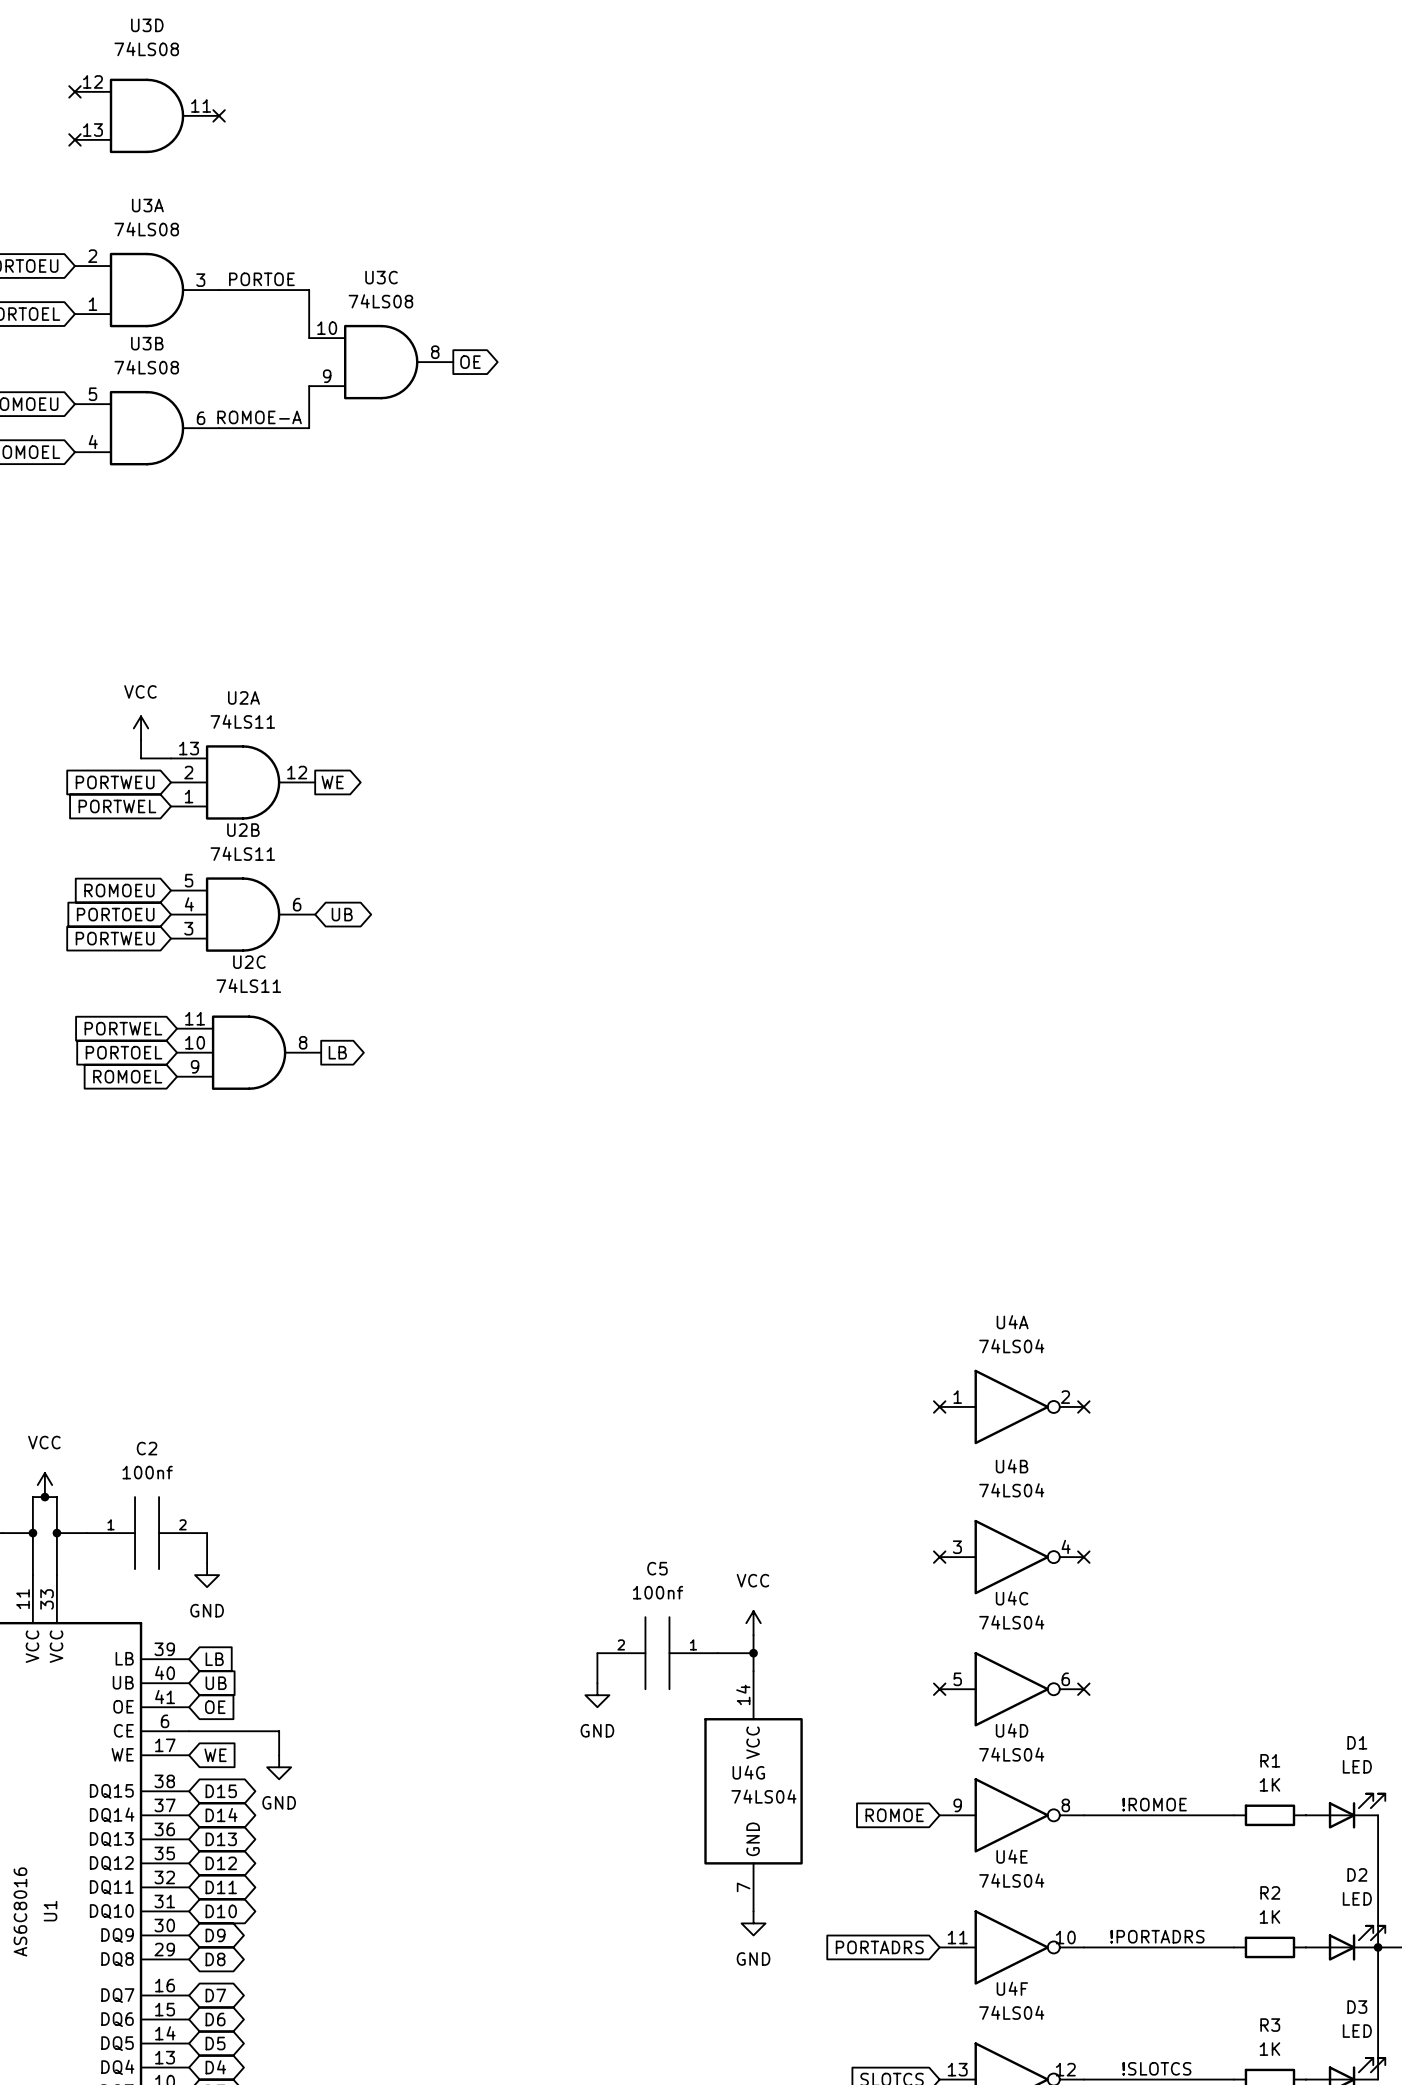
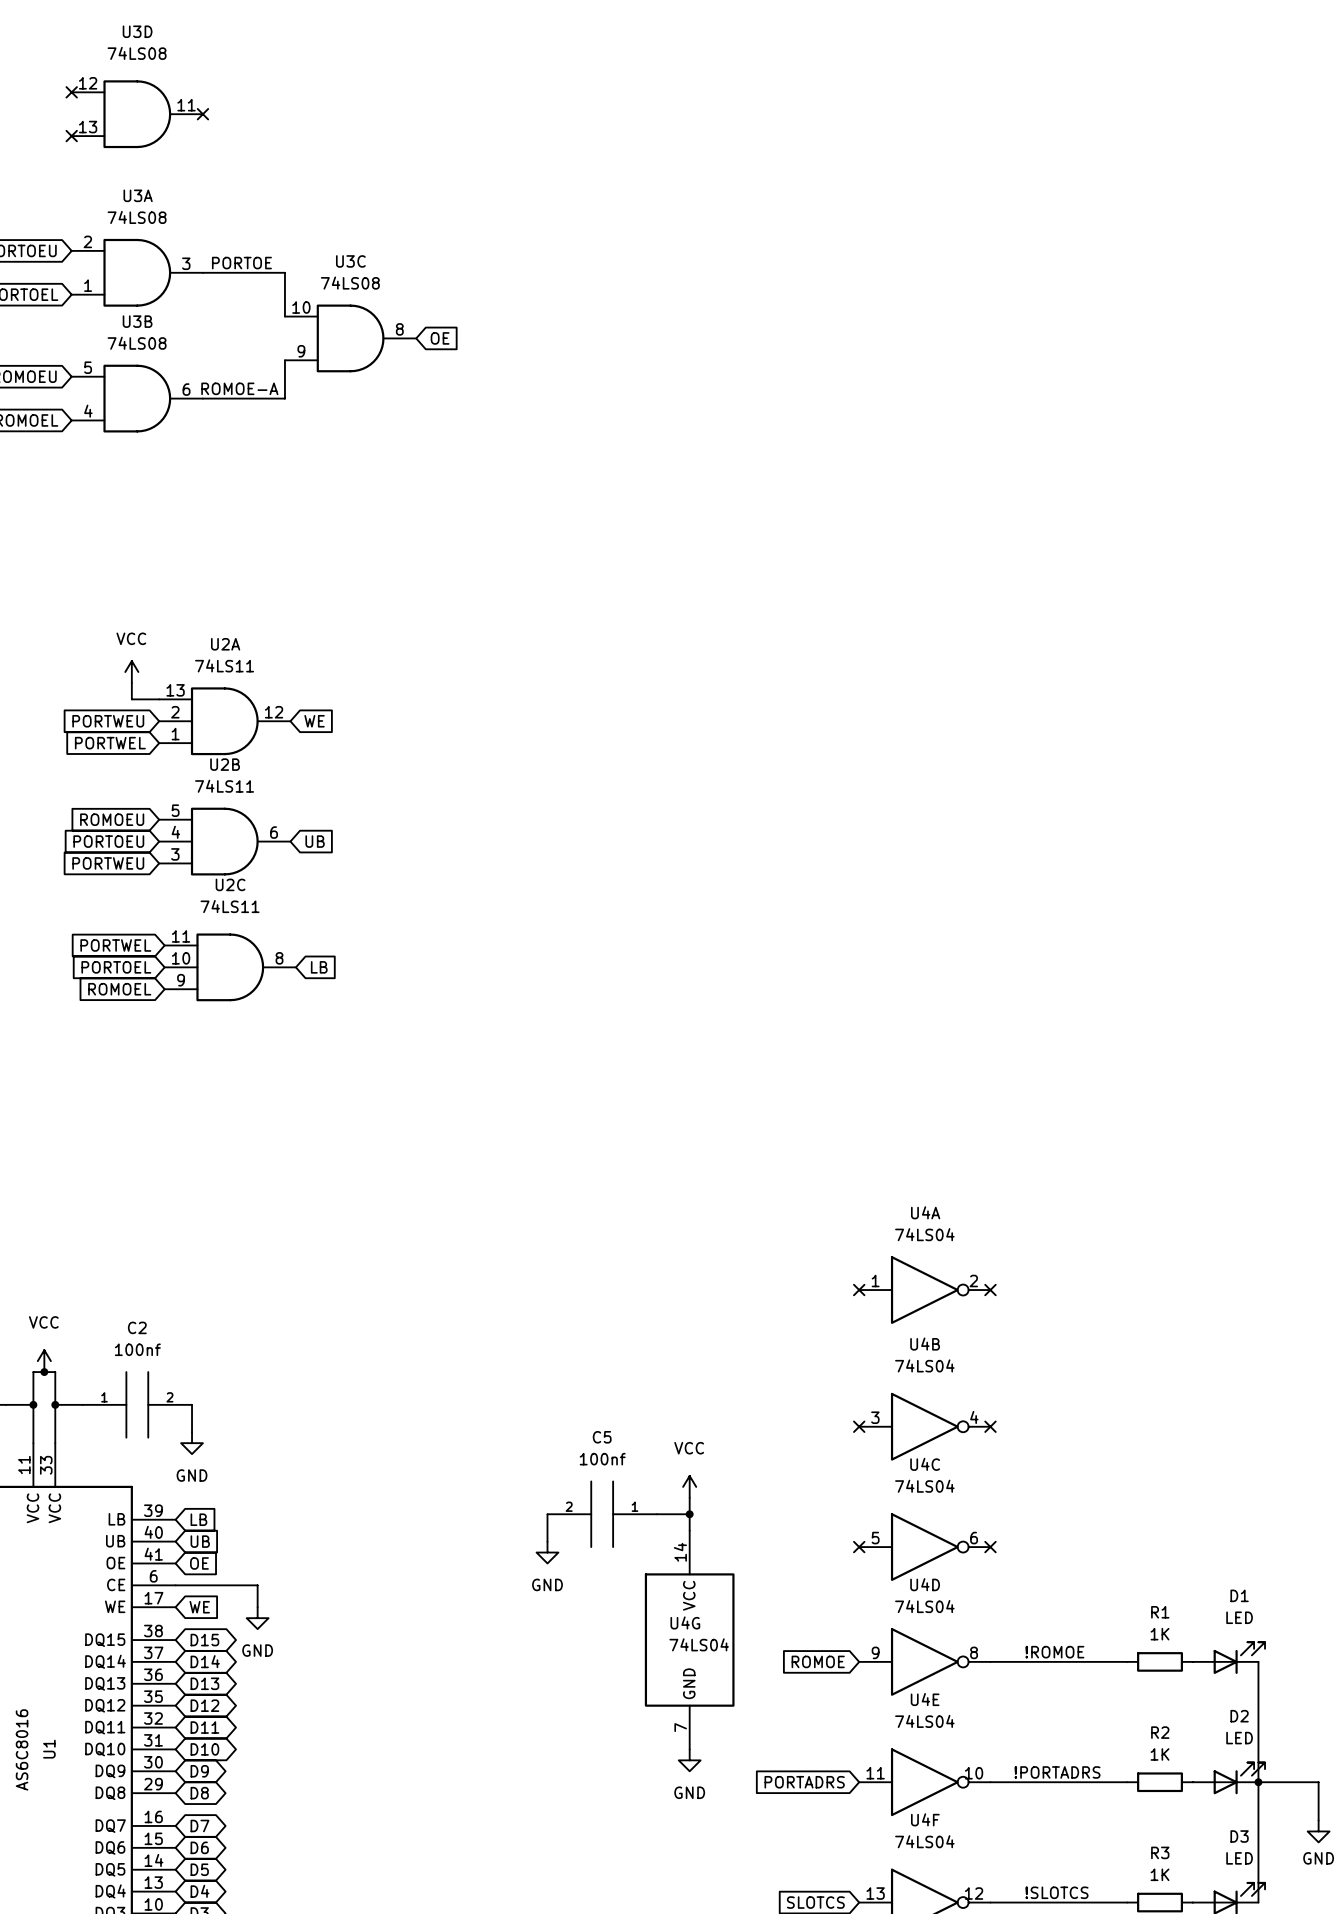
global label shape: output (470, 362) -> input (440, 338)
global label shape: output (332, 782) -> input (314, 721)
global label shape: bidirectional (342, 914) -> input (315, 841)
global label shape: output (337, 1052) -> input (319, 967)

